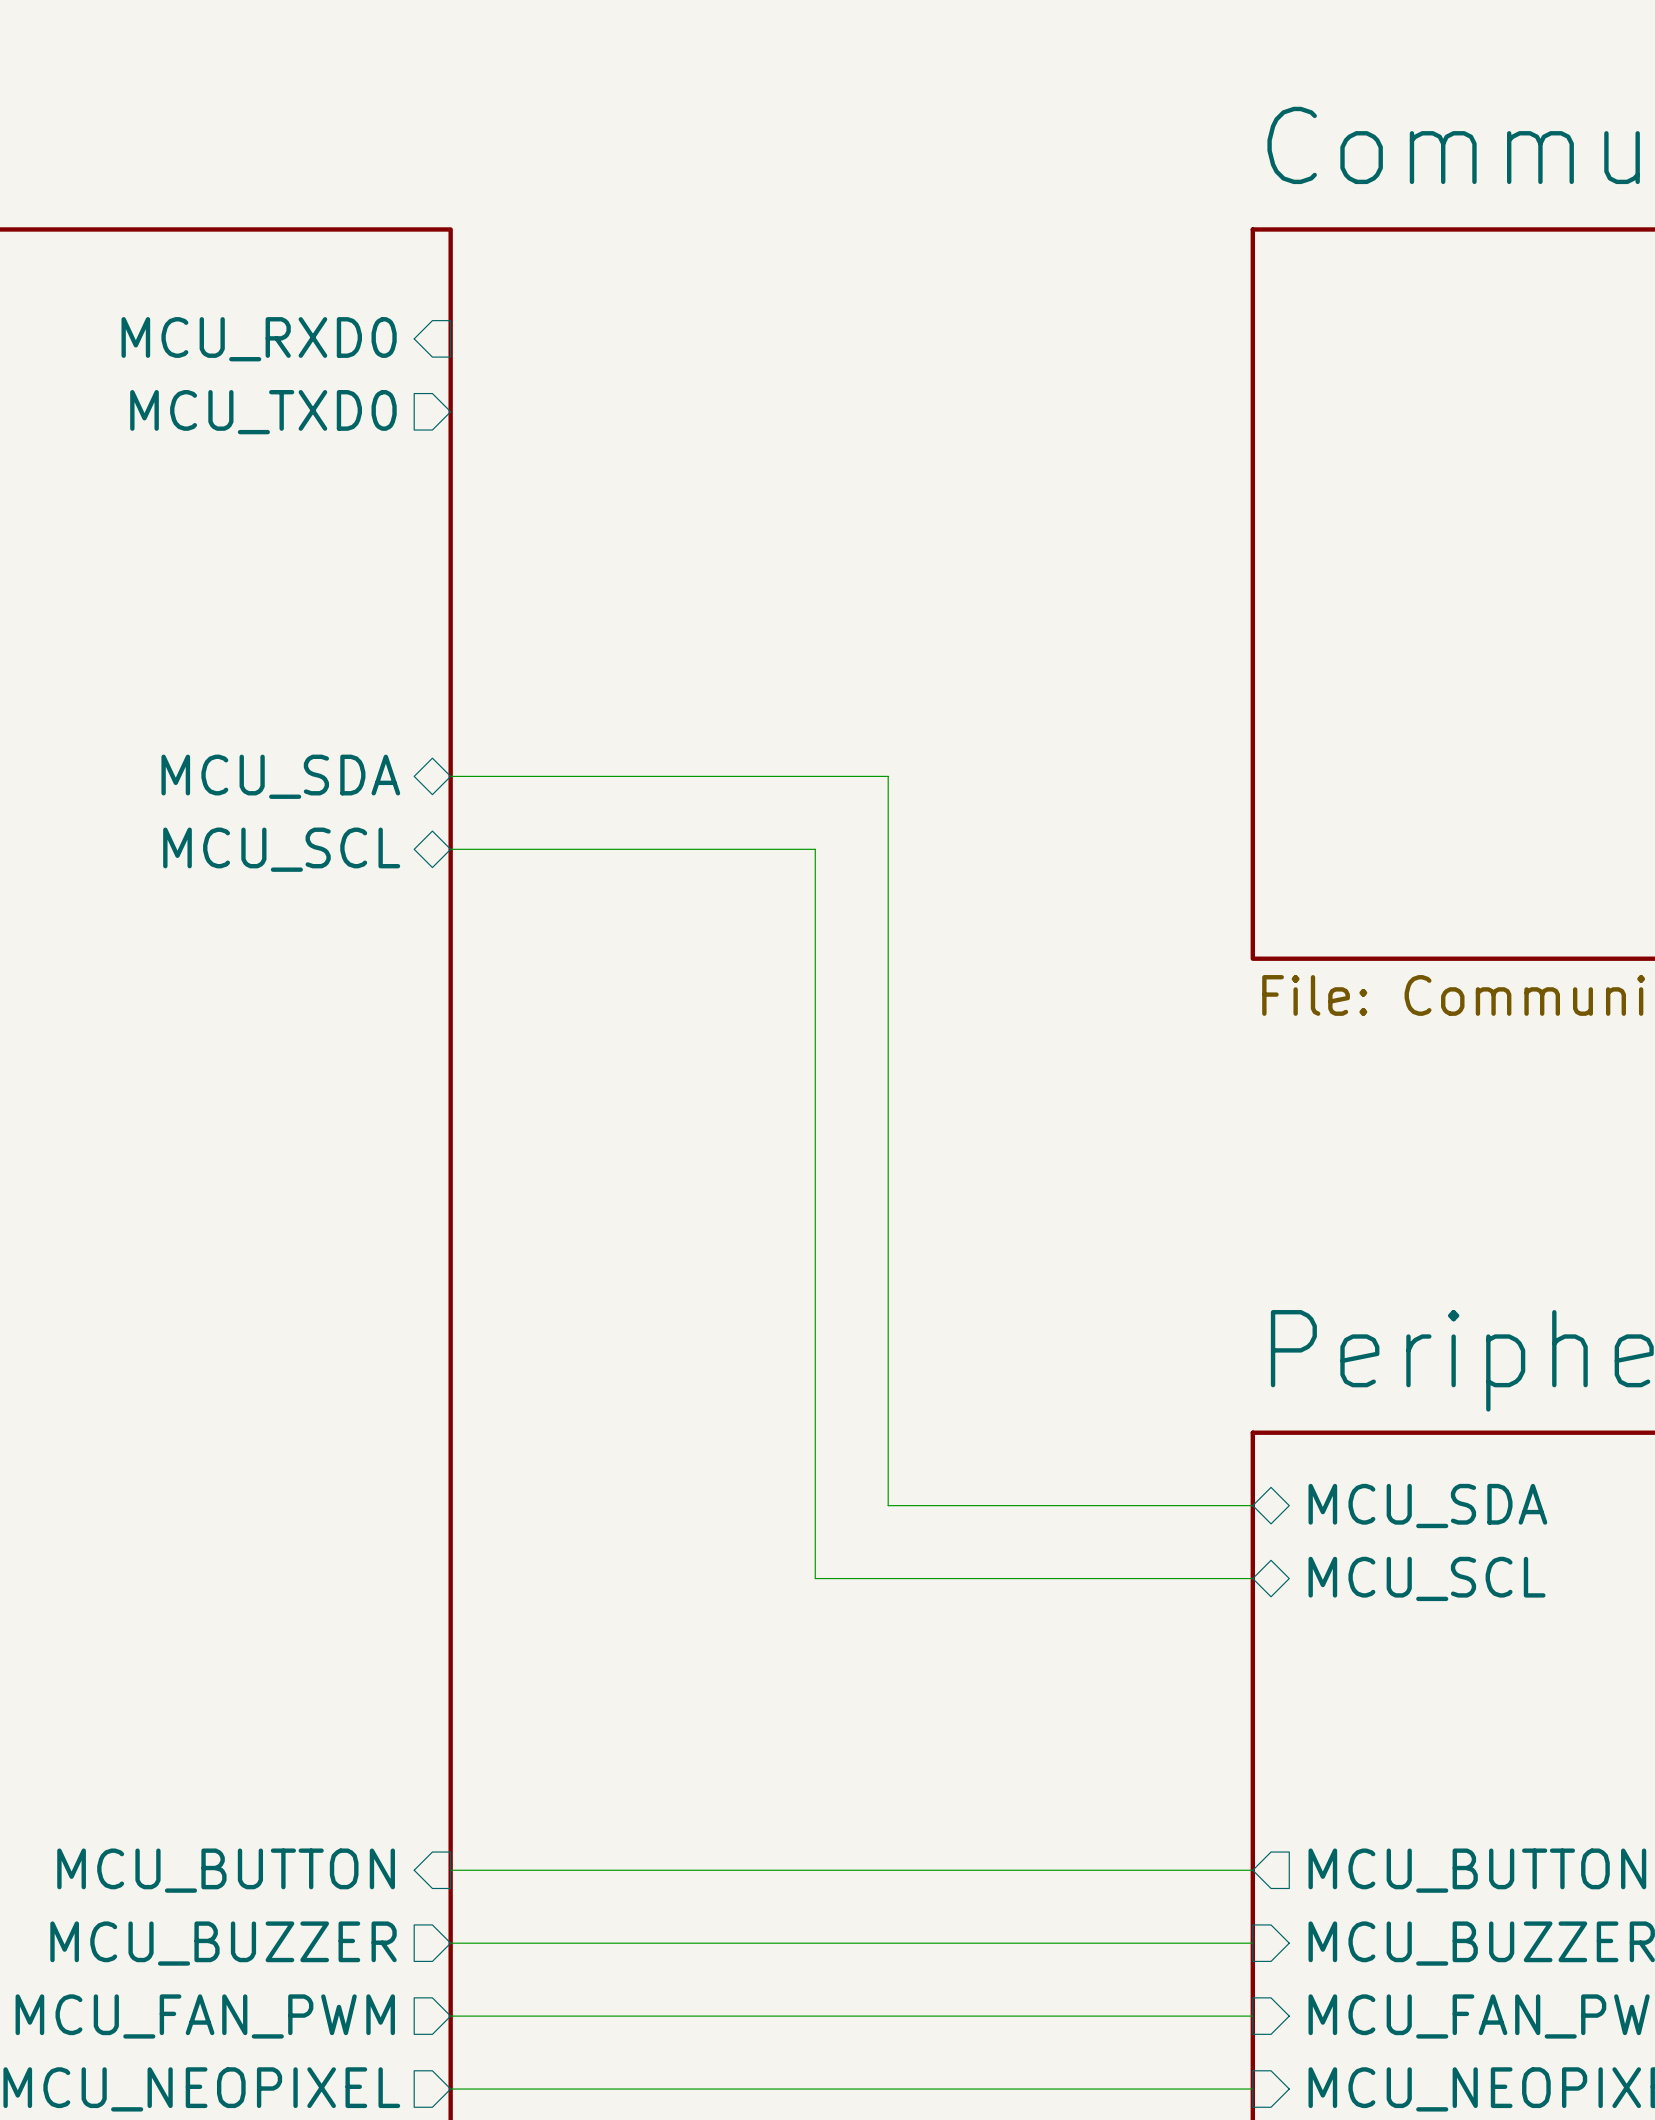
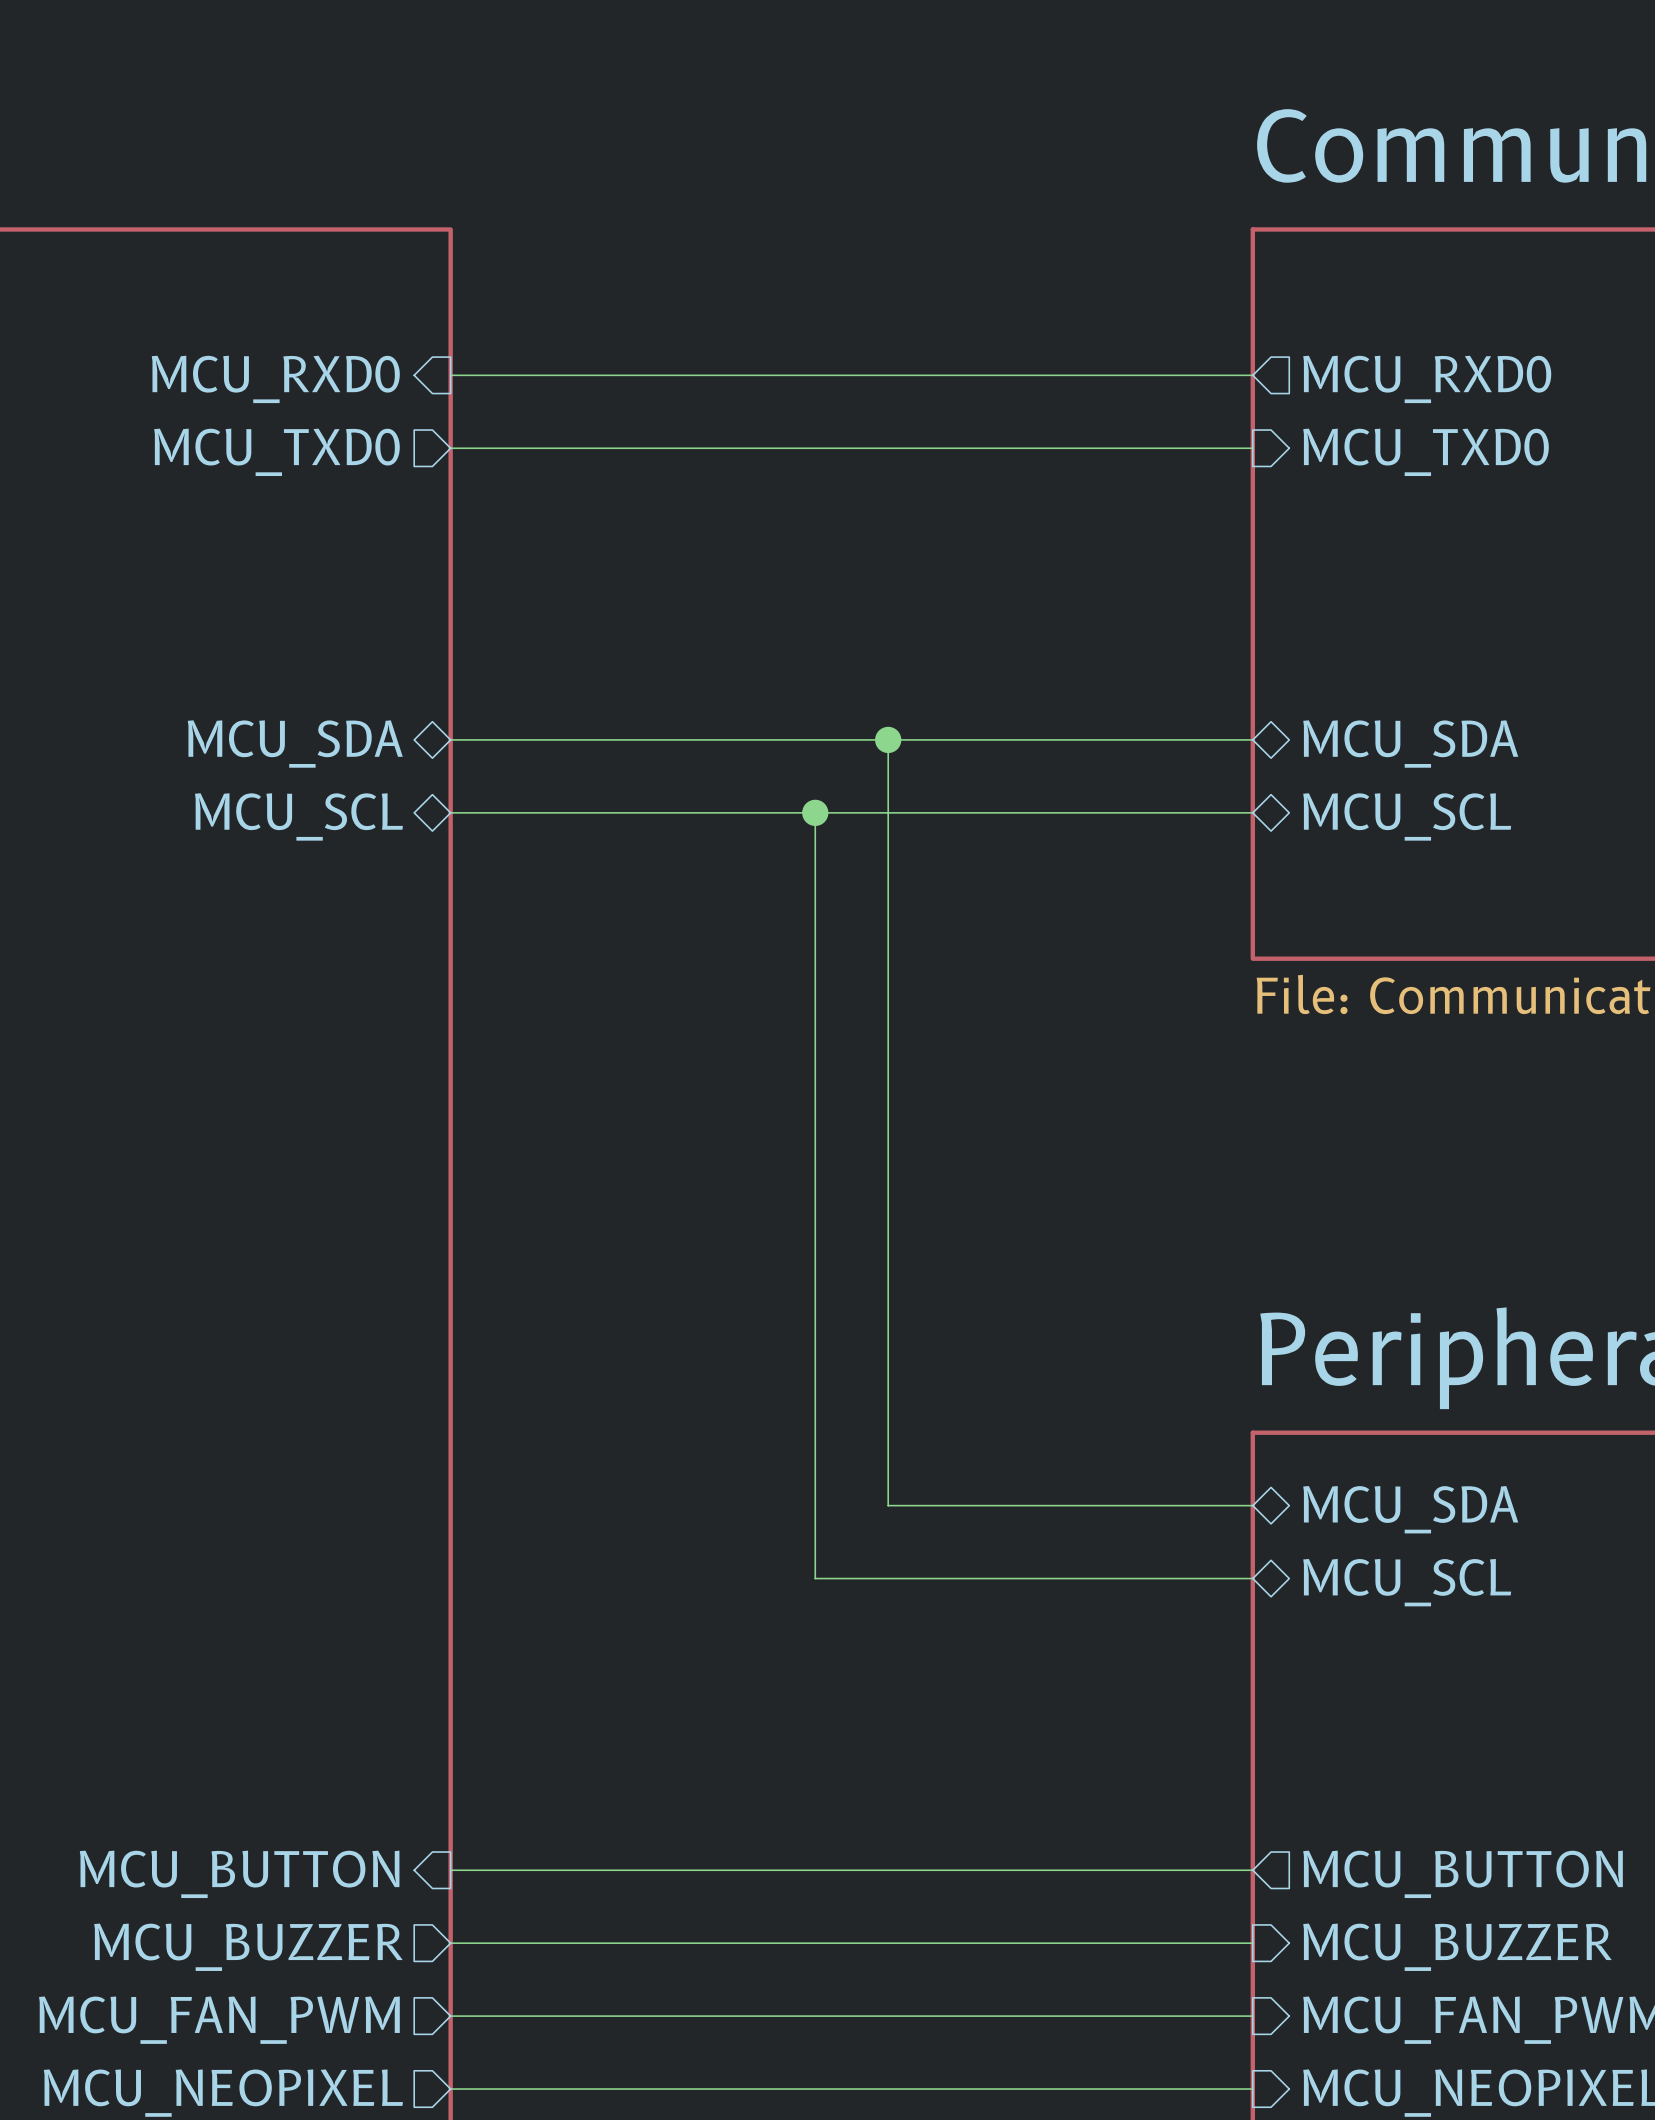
sheet pin position: MCU_RXD0 (259, 339) -> MCU_RXD0 (275, 379)
wire: none -> (450, 375) (1252, 375)
sheet pin: none -> MCU_RXD0 (1427, 379)
sheet pin position: MCU_TXD0 (263, 412) -> MCU_TXD0 (277, 452)
wire: none -> (450, 448) (1252, 448)
sheet pin: none -> MCU_TXD0 (1426, 452)
wire: none -> (450, 739) (1252, 739)
junction: none -> (888, 739)
sheet pin: none -> MCU_SDA (1410, 744)
sheet pin position: MCU_SDA (280, 776) -> MCU_SDA (295, 744)
wire: (450, 776) (888, 776) -> (888, 739) (888, 776)
wire: none -> (450, 812) (1252, 812)
junction: none -> (815, 812)
sheet pin: none -> MCU_SCL (1407, 816)
sheet pin position: MCU_SCL (281, 849) -> MCU_SCL (298, 816)
wire: (450, 849) (815, 849) -> (815, 812) (815, 849)

